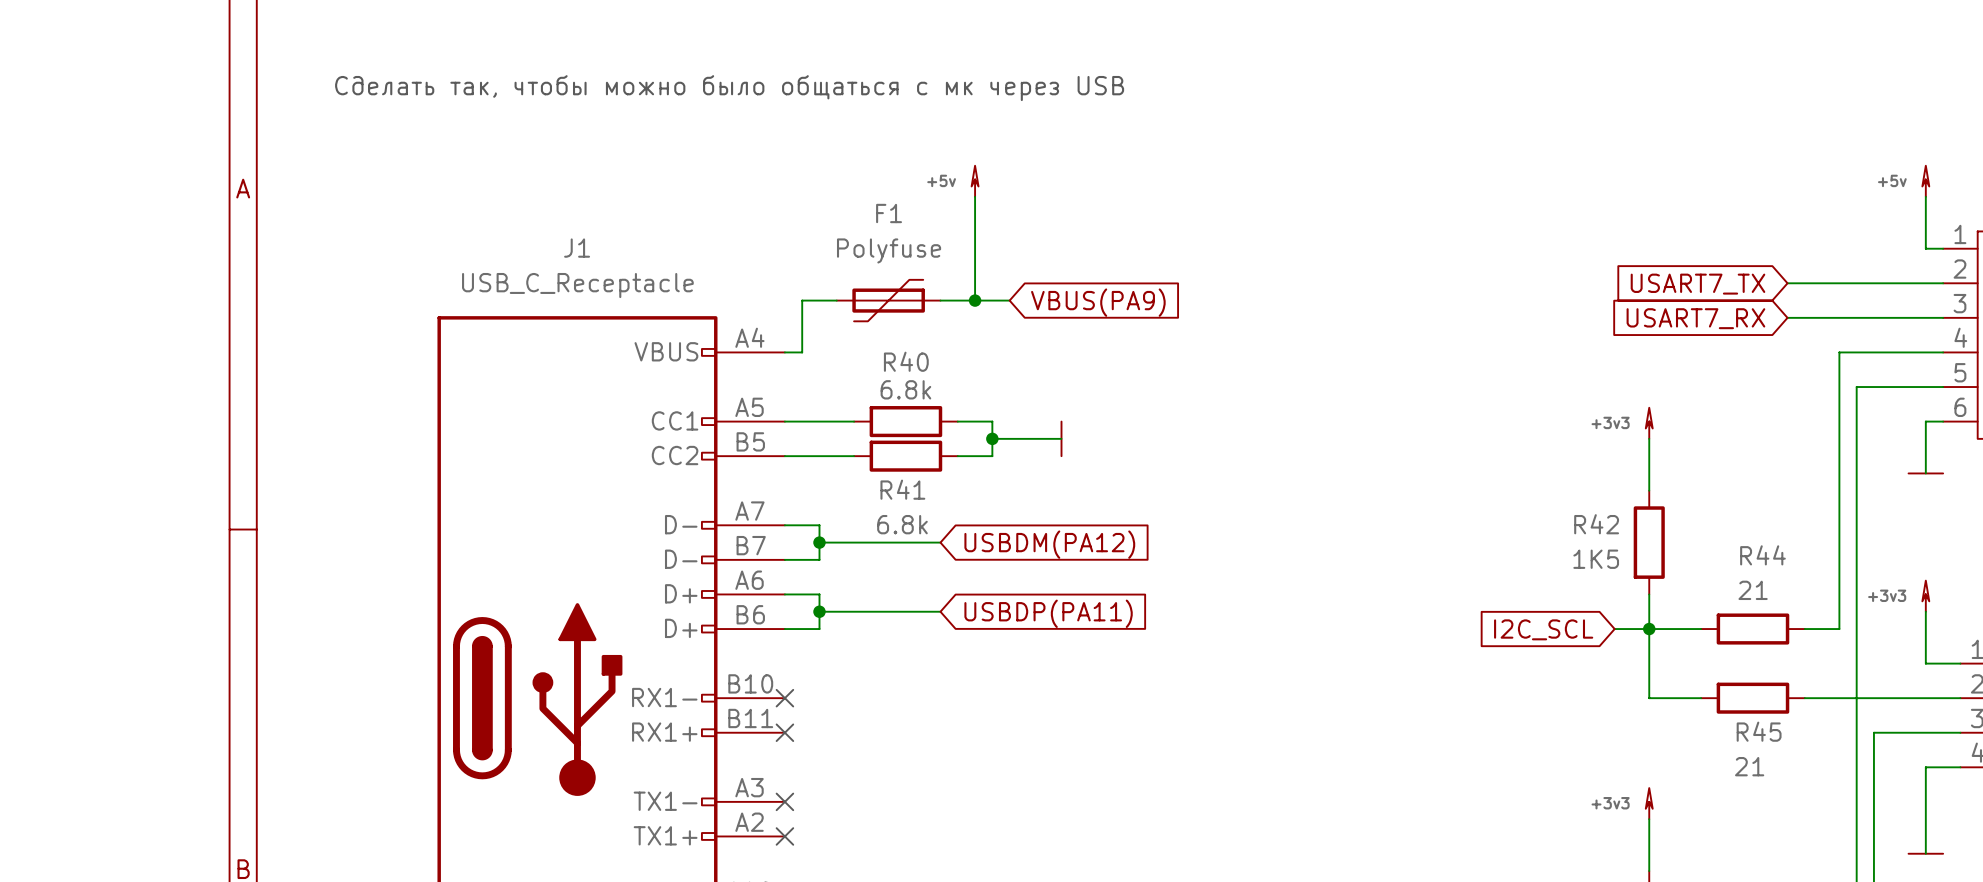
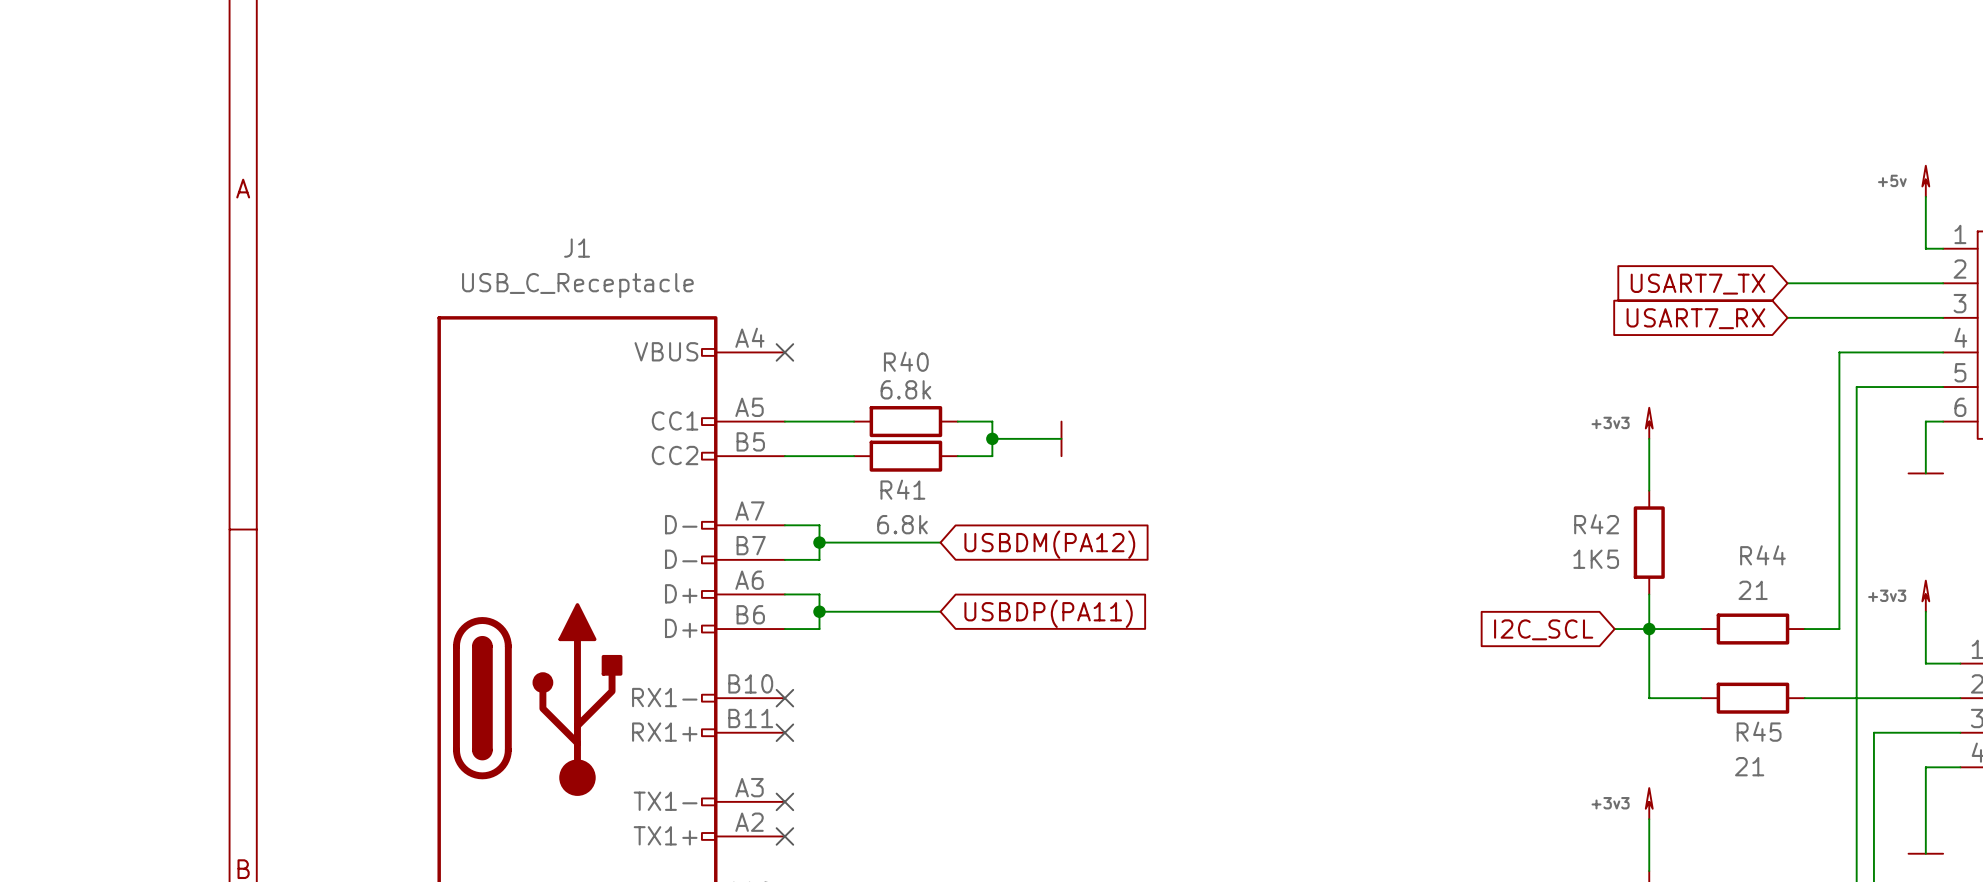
text: Сделать так, чтобы можно было общаться с мк через USB (729, 88) -> none
power symbol: +5v (975, 181) -> none
wire: (975, 196) (975, 300) -> none
wire: (836, 300) (802, 300) (802, 352) (784, 352) -> none
F1: Polyfuse (888, 300) -> none
wire: (940, 300) (1009, 300) -> none
junction: (975, 300) -> none
global label: VBUS(PA9) (1098, 302) -> none
no-connect mark: none -> (784, 352)

